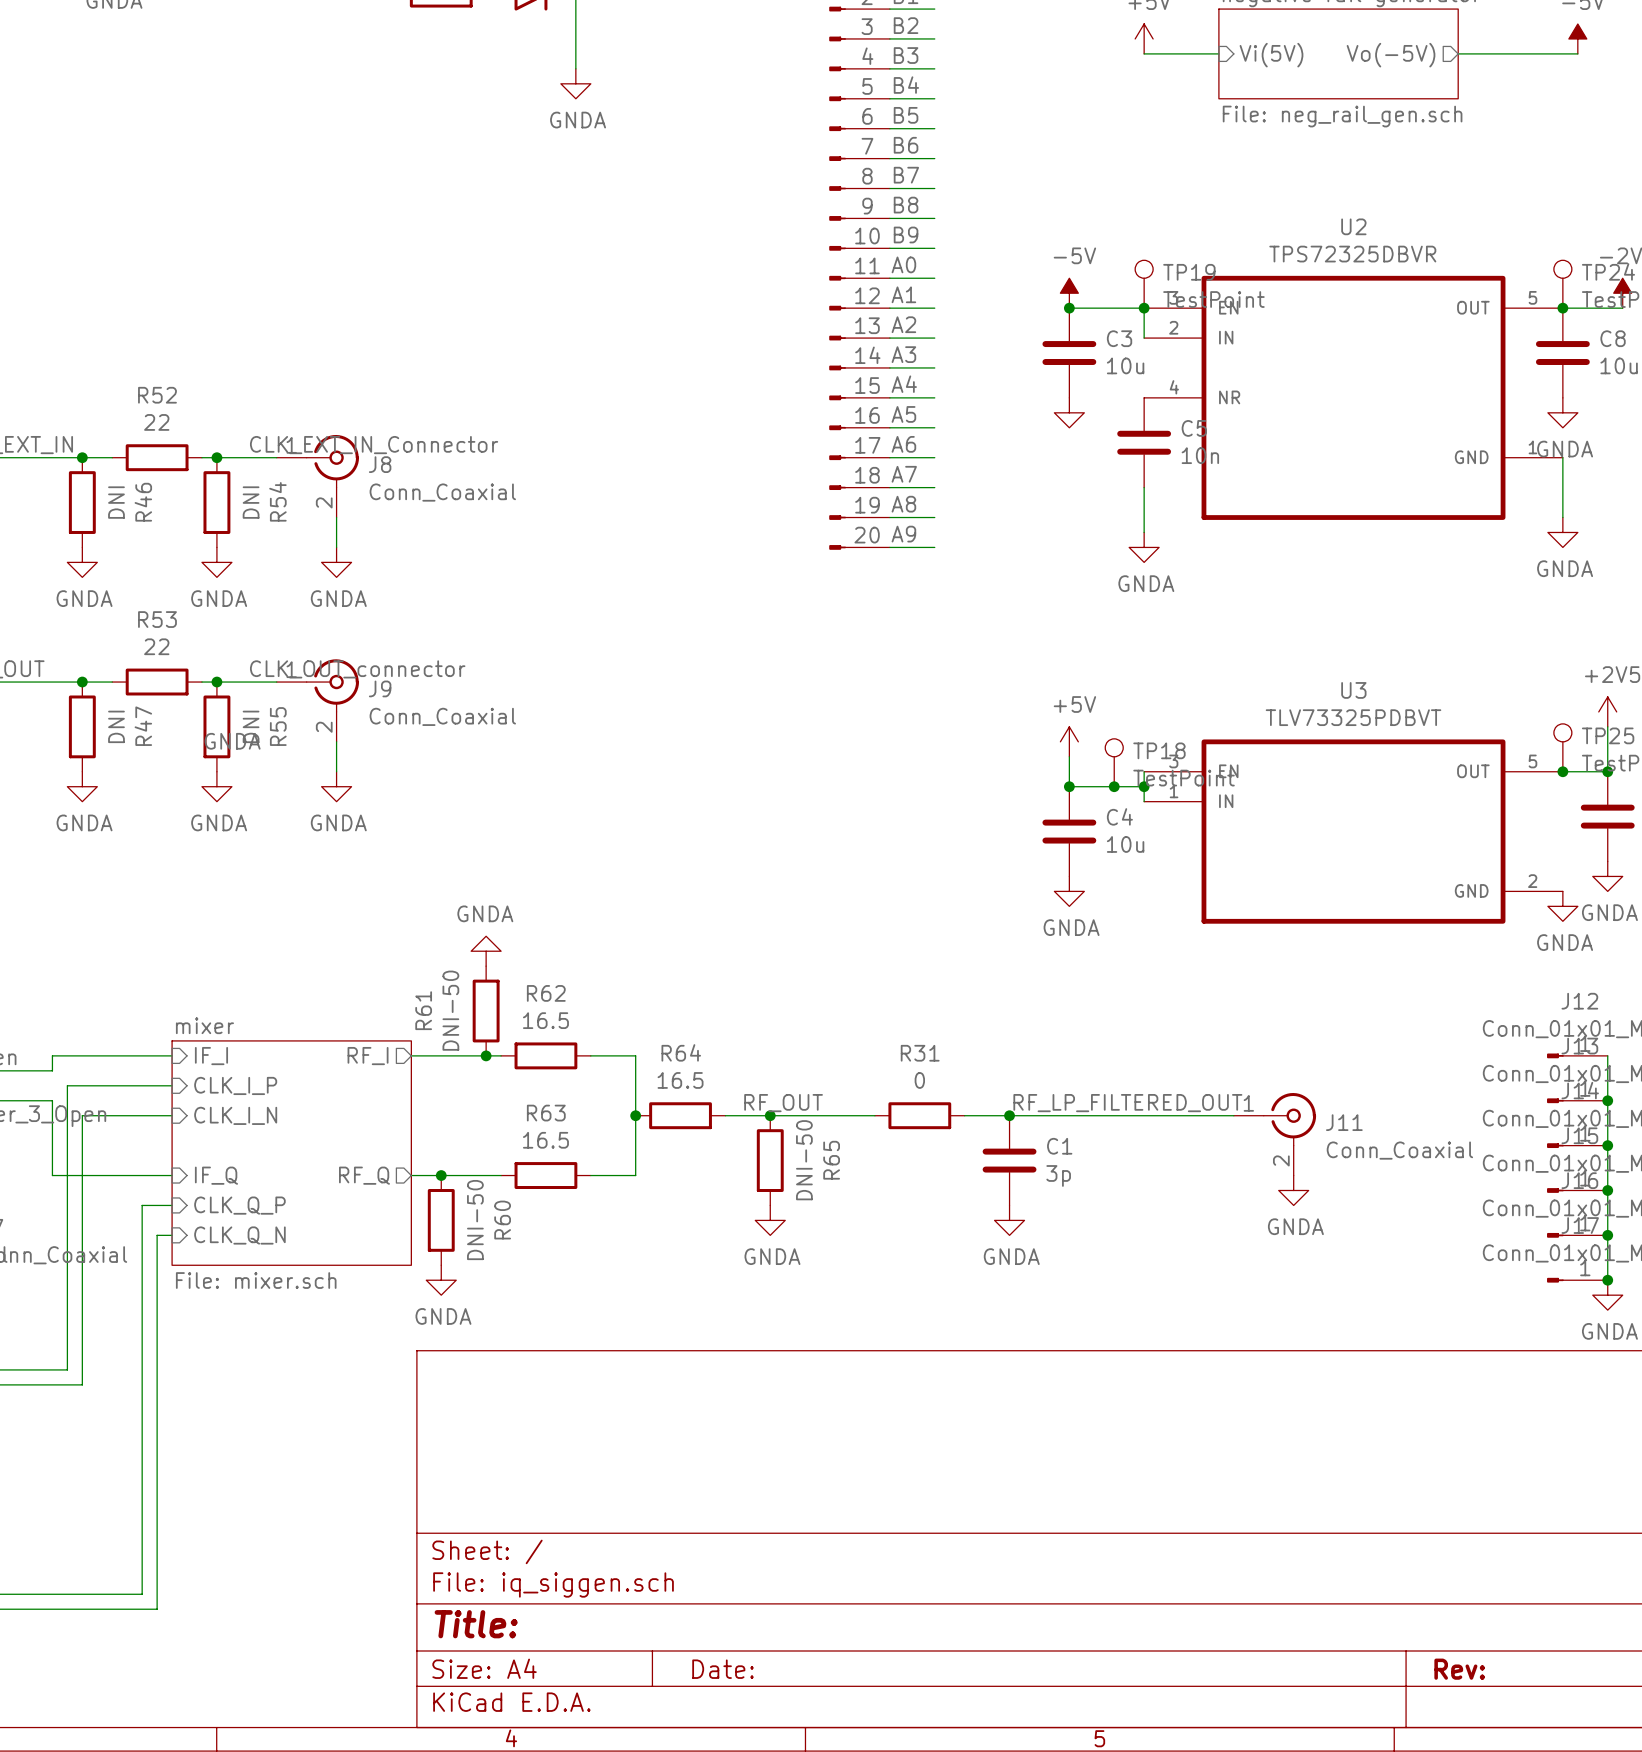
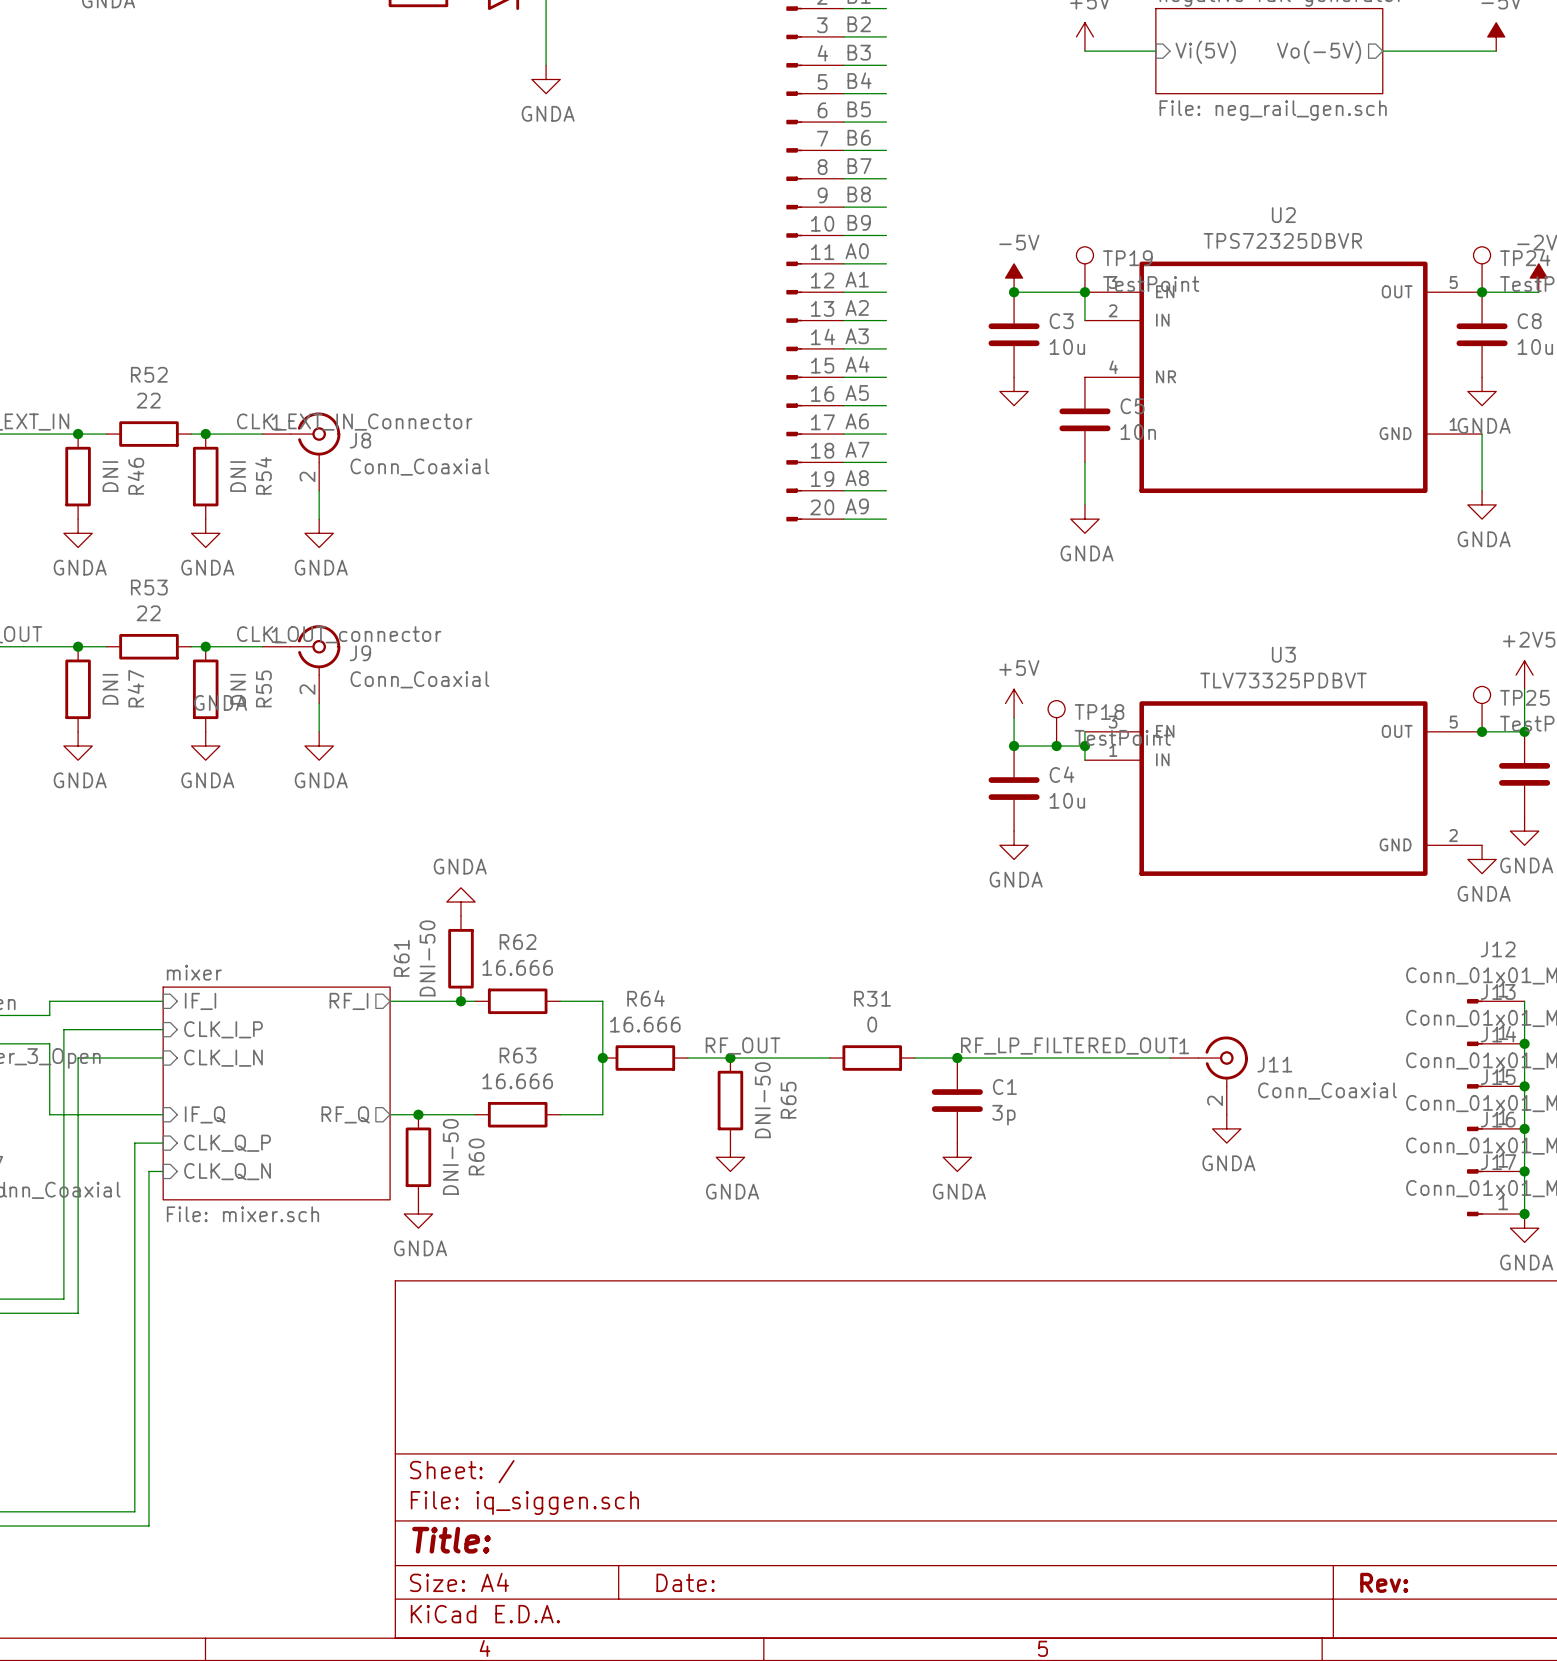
R62 value: 16.5 (545, 1020) -> 16.666 (517, 967)
R64 value: 16.5 (680, 1080) -> 16.666 (645, 1024)
R63 value: 16.5 (545, 1140) -> 16.666 (517, 1081)

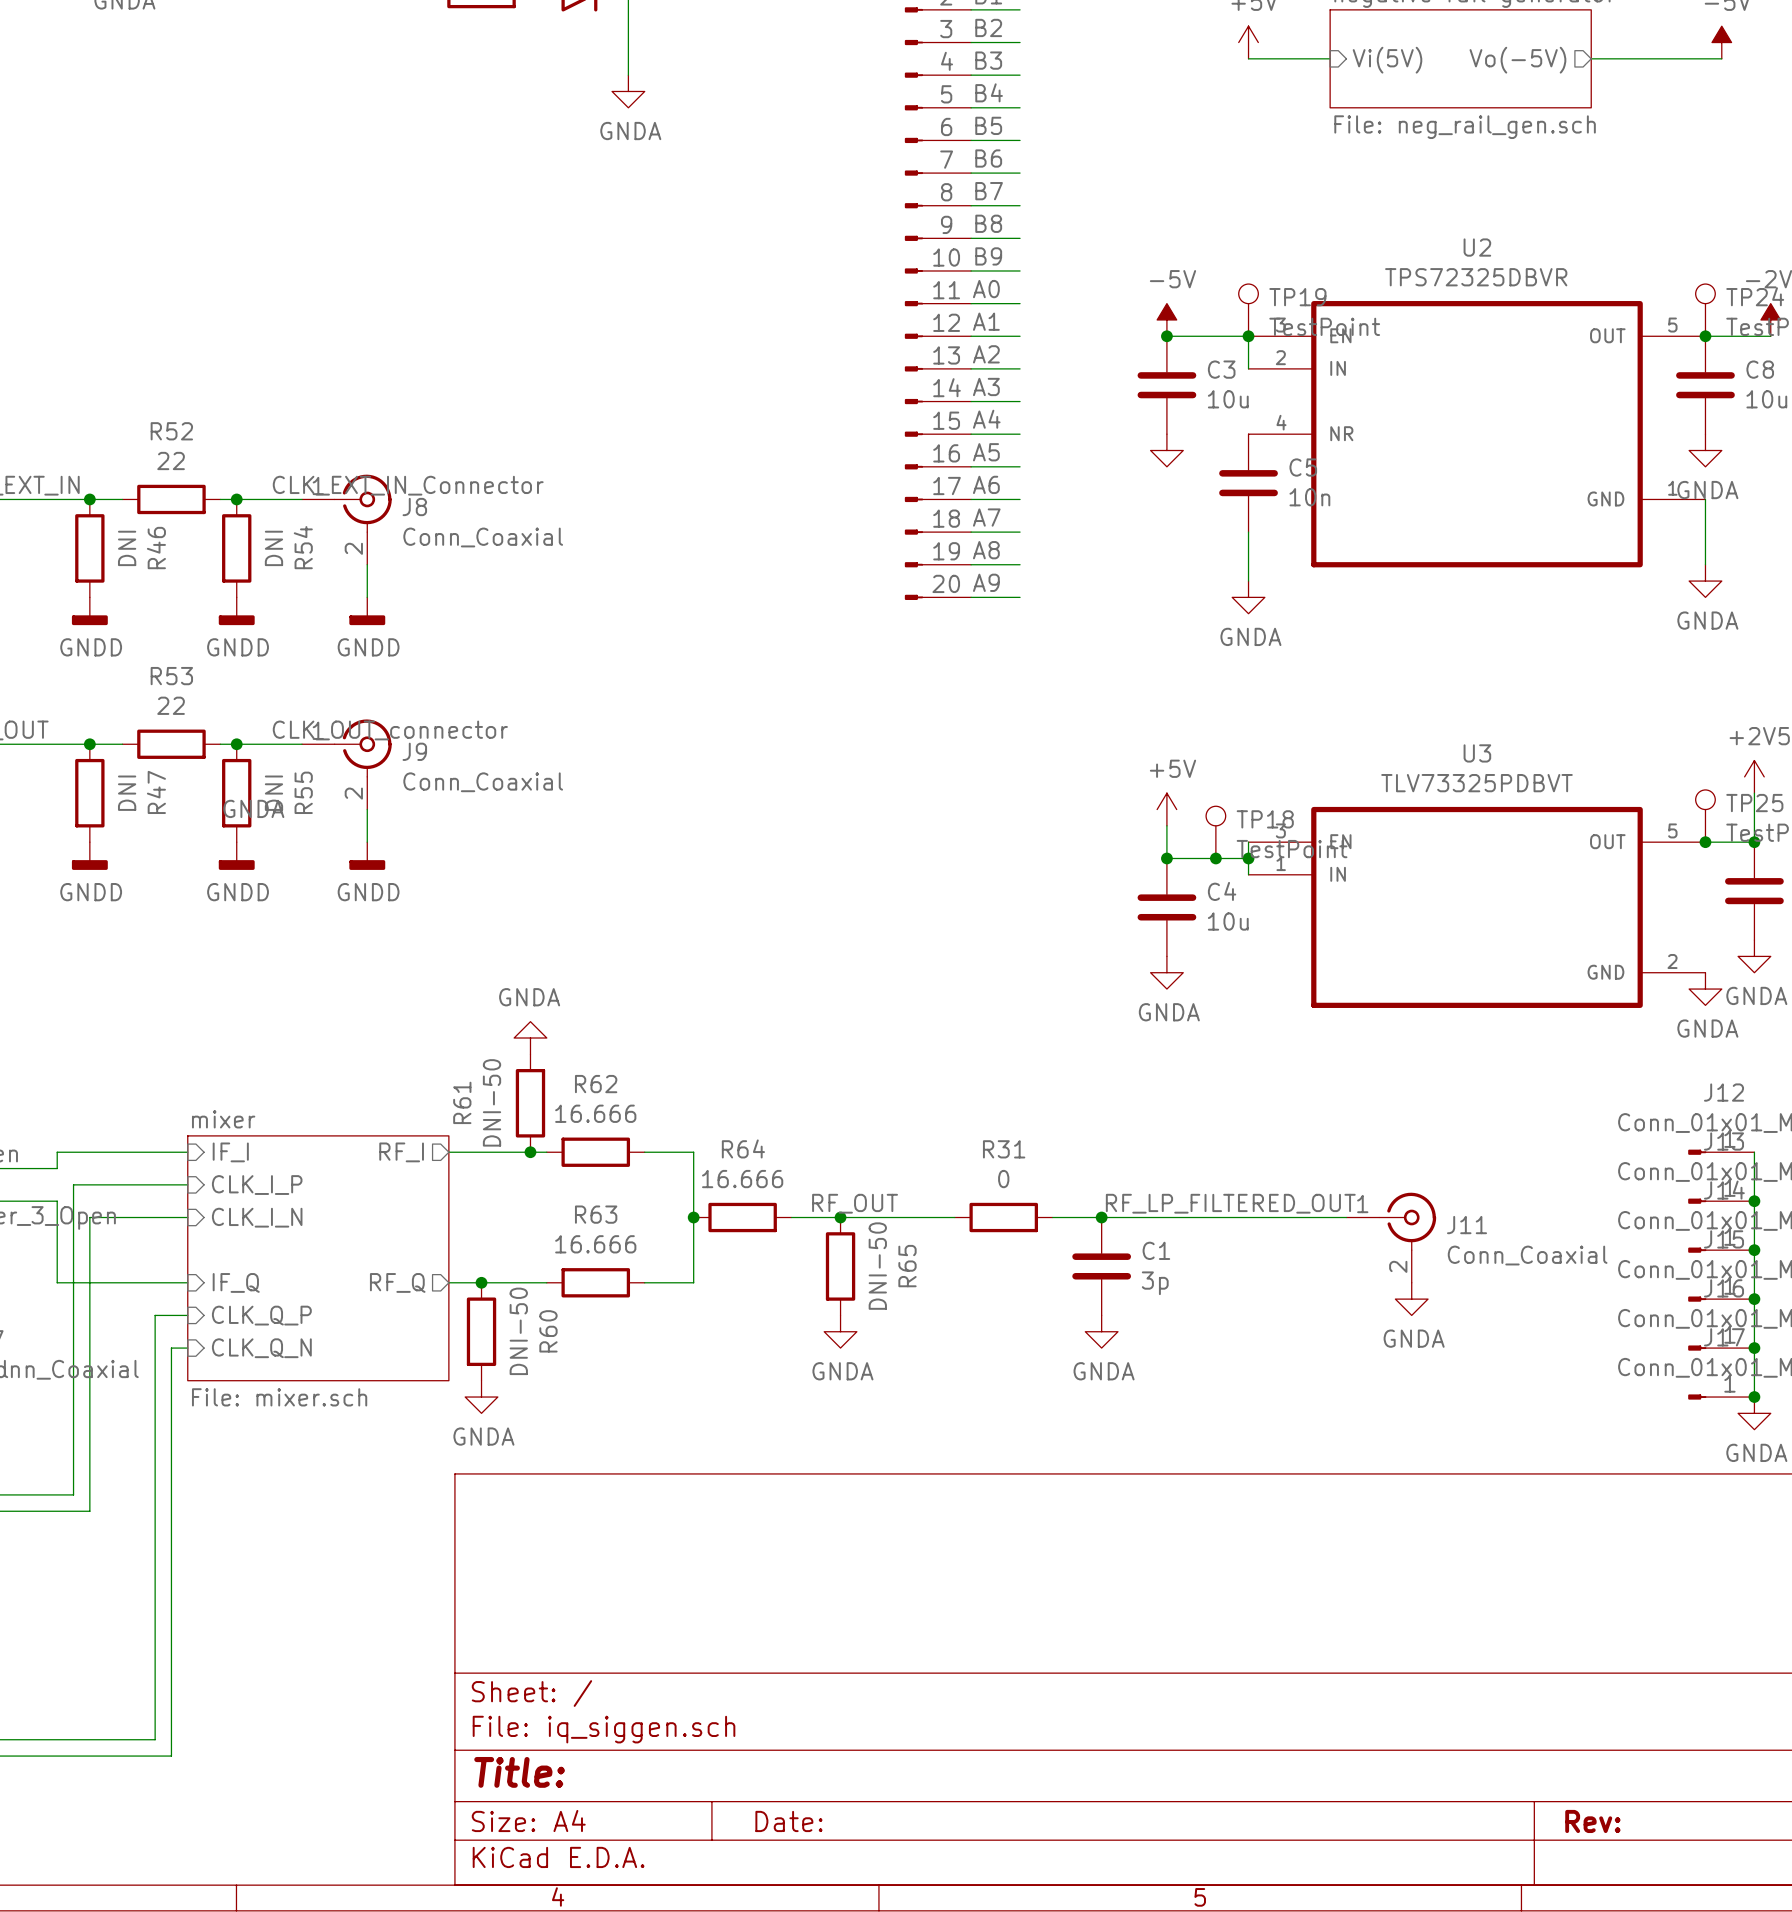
power symbol: GNDA (78, 533) -> GNDD (89, 611)
power symbol: GNDA (205, 533) -> GNDD (236, 611)
power symbol: GNDA (319, 533) -> GNDD (367, 611)
power symbol: GNDA (78, 746) -> GNDD (89, 856)
power symbol: GNDA (205, 746) -> GNDD (236, 856)
power symbol: GNDA (319, 746) -> GNDD (367, 856)

